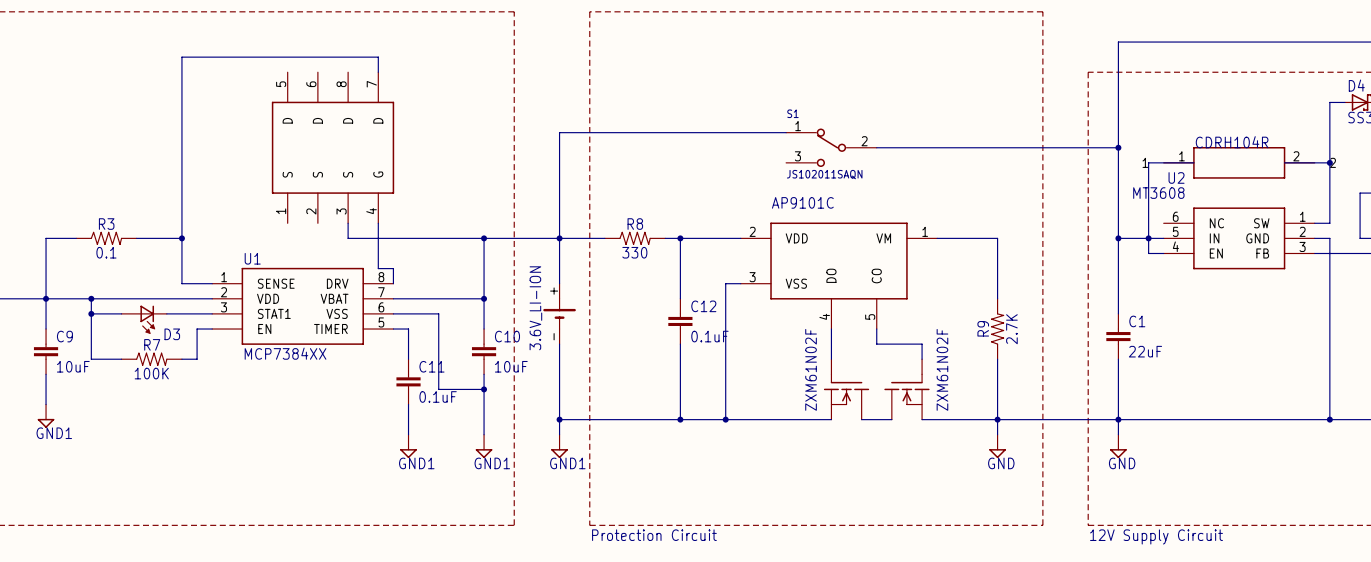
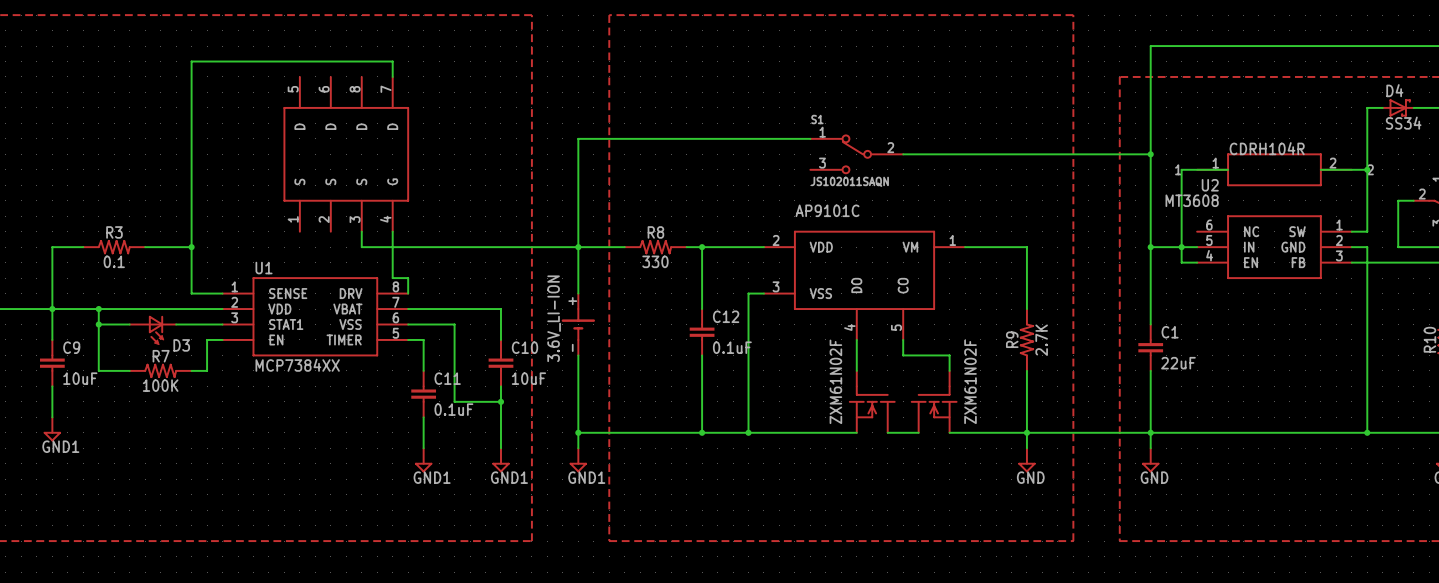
wire: (484, 238) (484, 298) -> none
junction: (484, 238) -> none
junction: (484, 298) -> none
text: Protection Circuit (654, 535) -> none
text: 12V Supply Circuit (1156, 536) -> none

